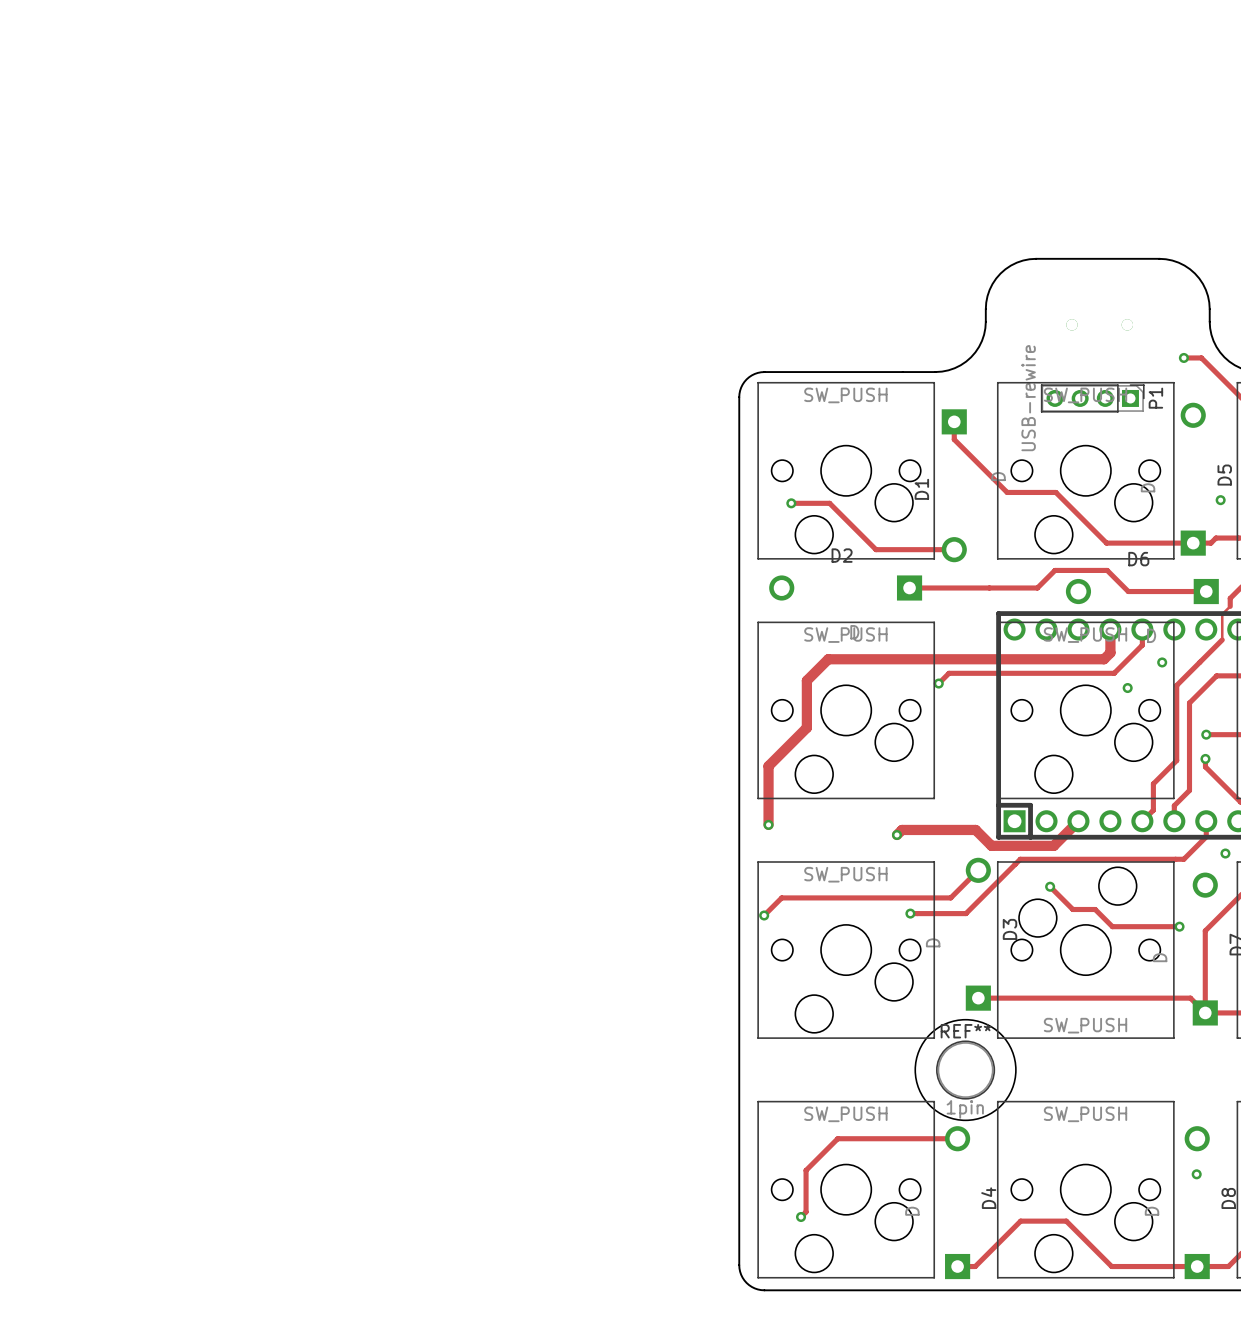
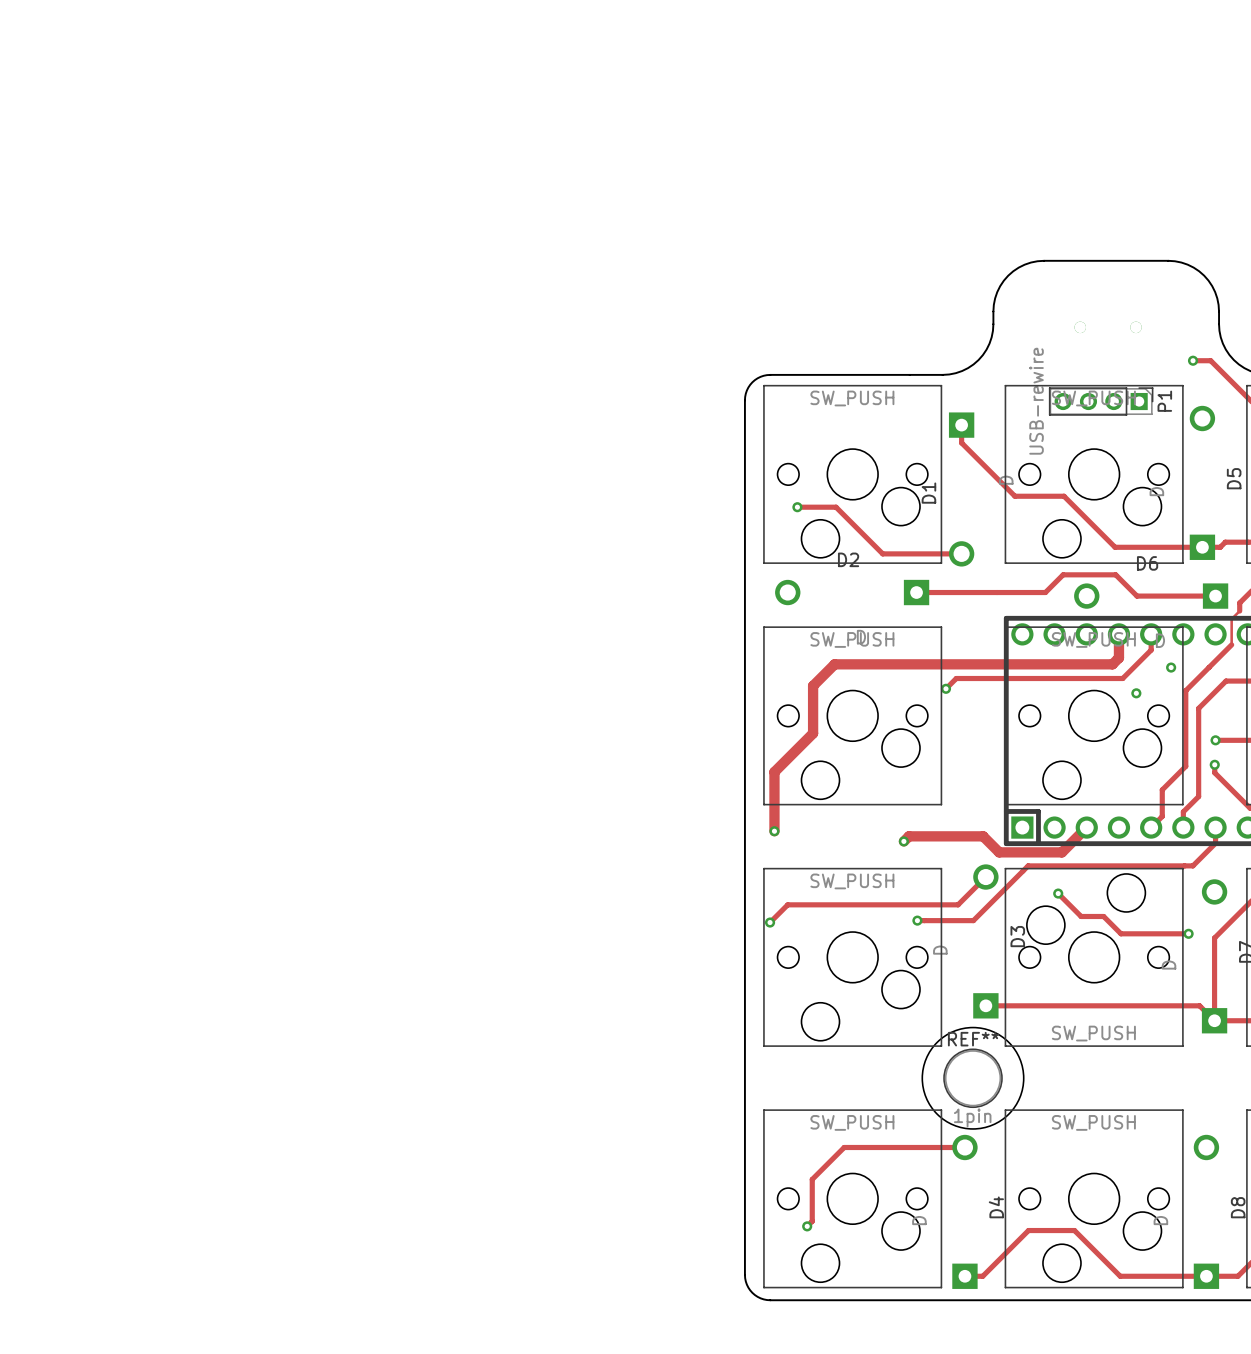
part: (1220, 500) -> none
part: (1225, 853) -> none
part: (1196, 1174) -> none

